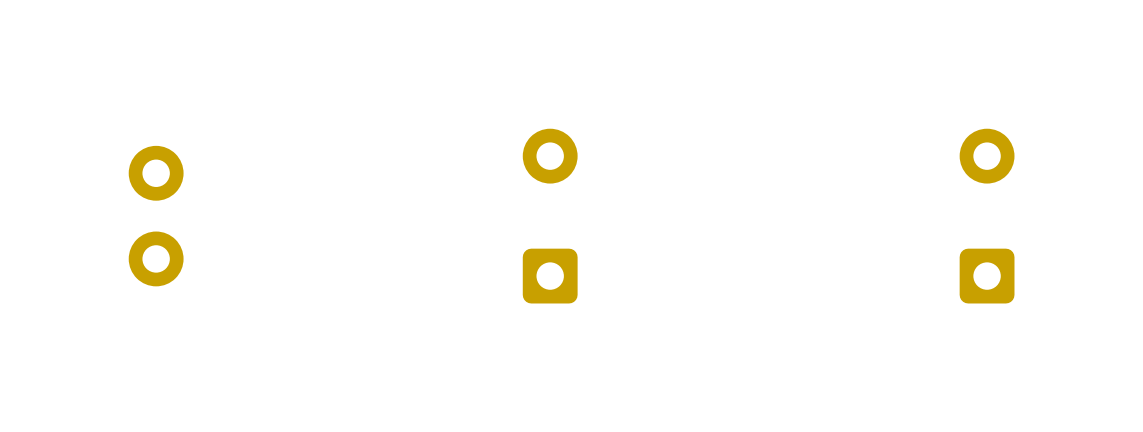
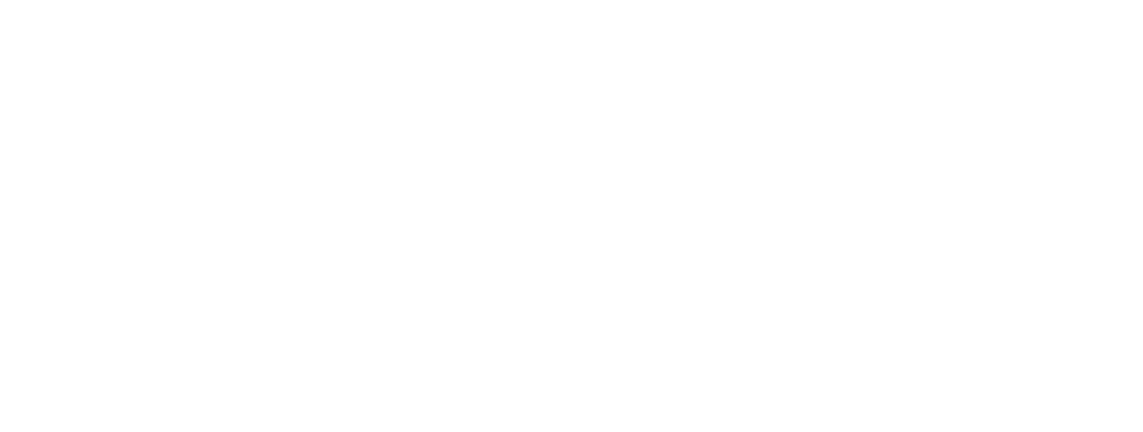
part: (156, 216) -> none
part: (550, 216) -> none
part: (987, 216) -> none

